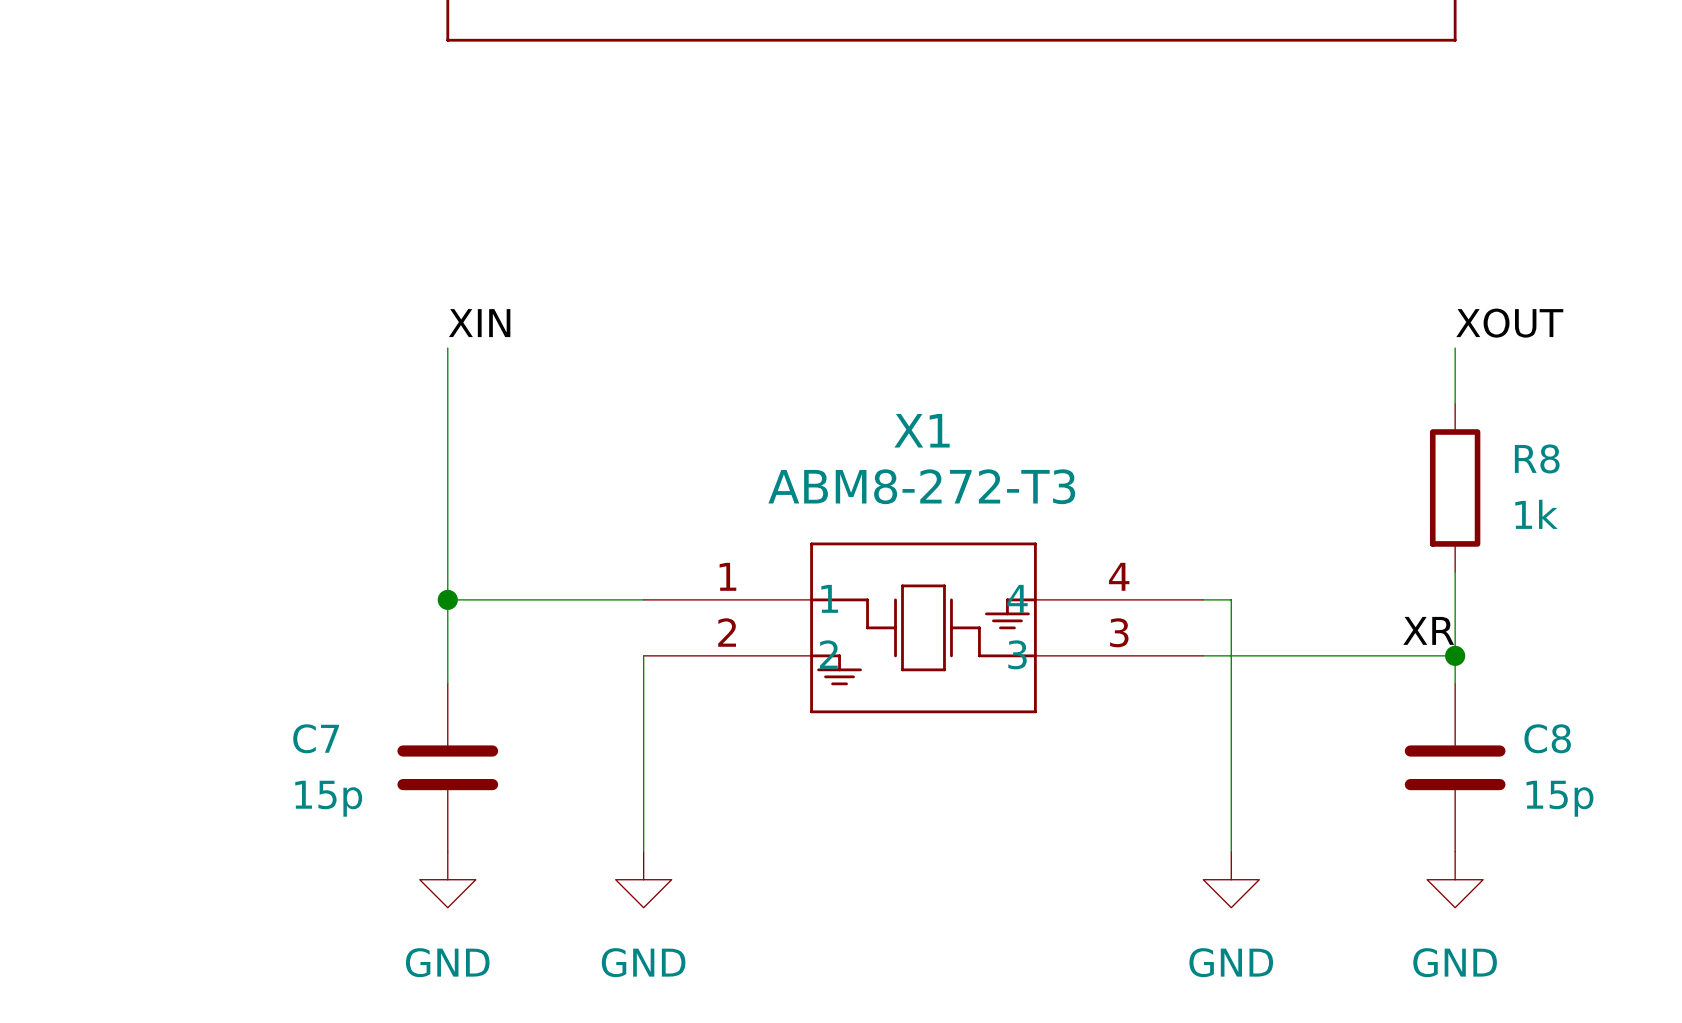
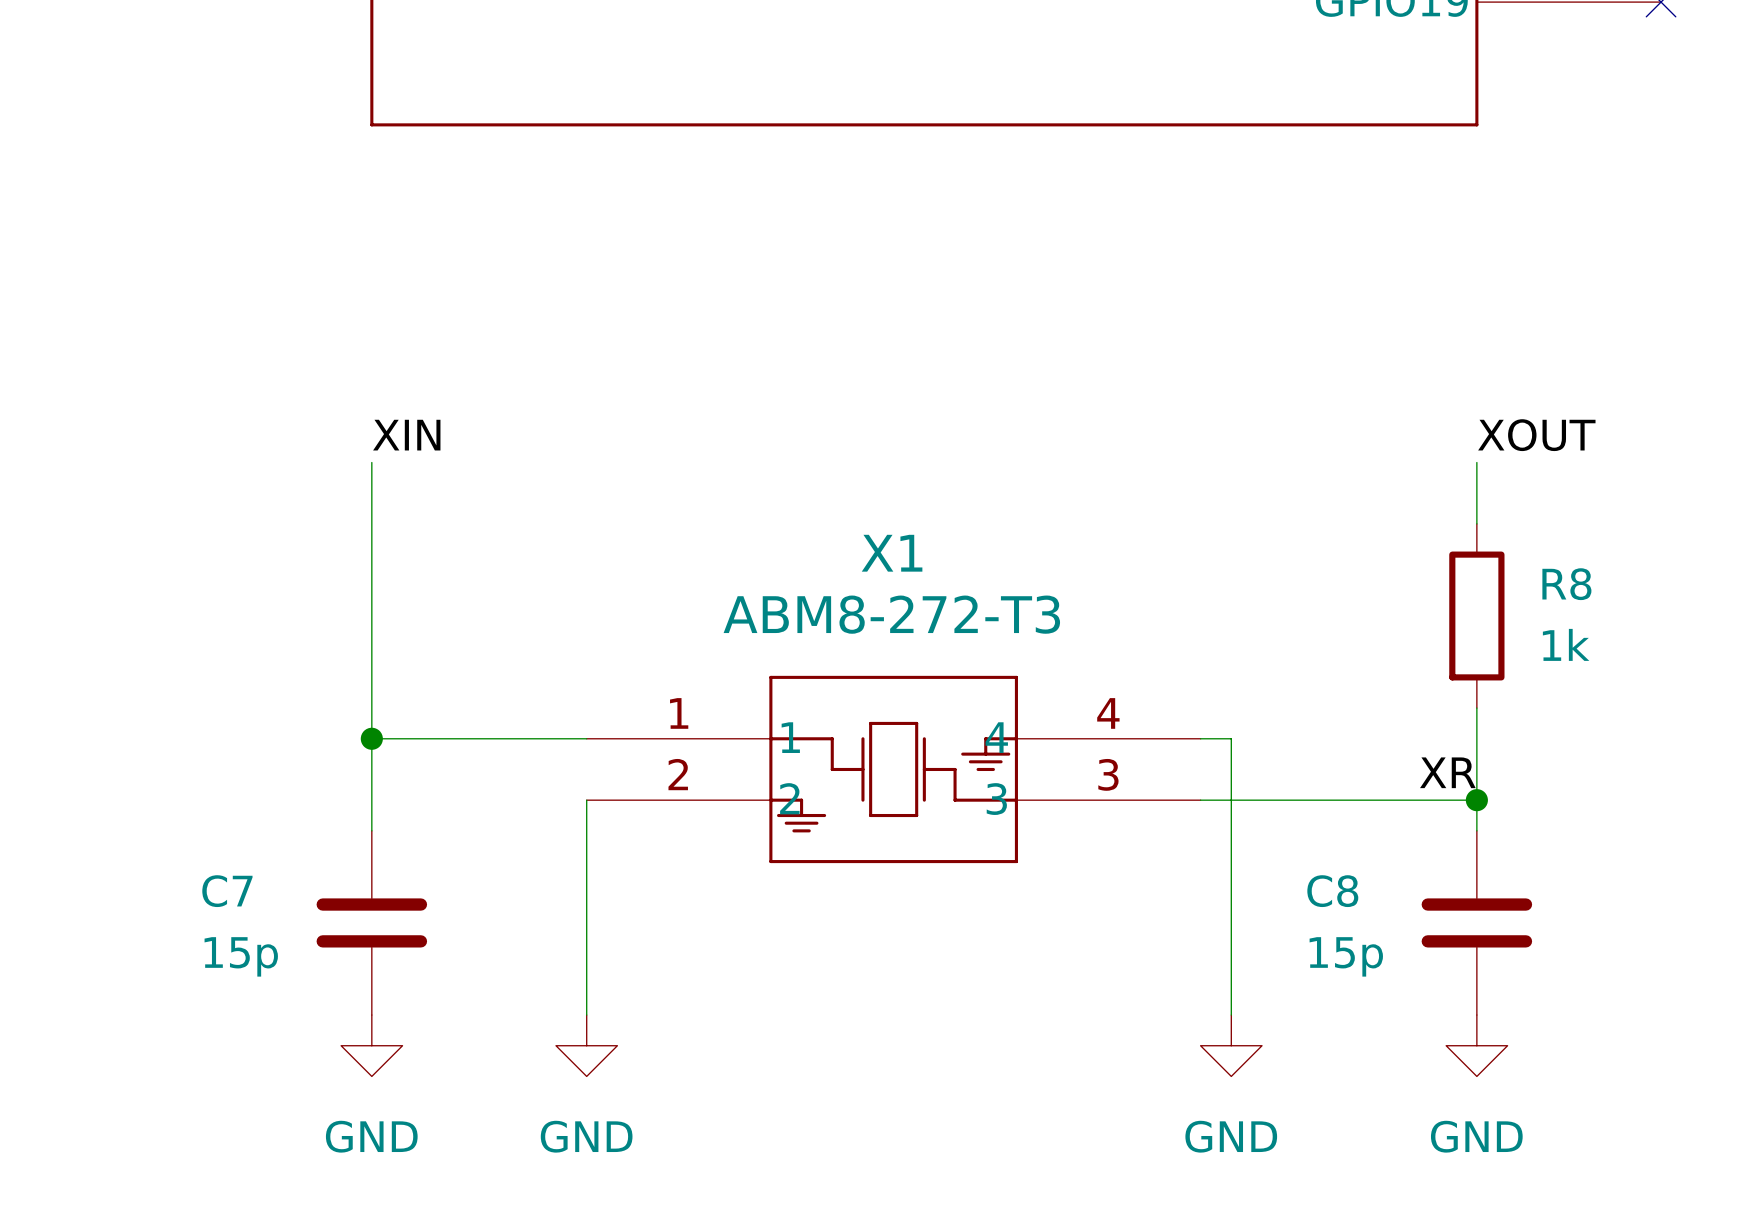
C8 name position: C8 (1547, 738) -> C8 (1332, 891)
C8 value position: 15p (1559, 798) -> 15p (1346, 956)

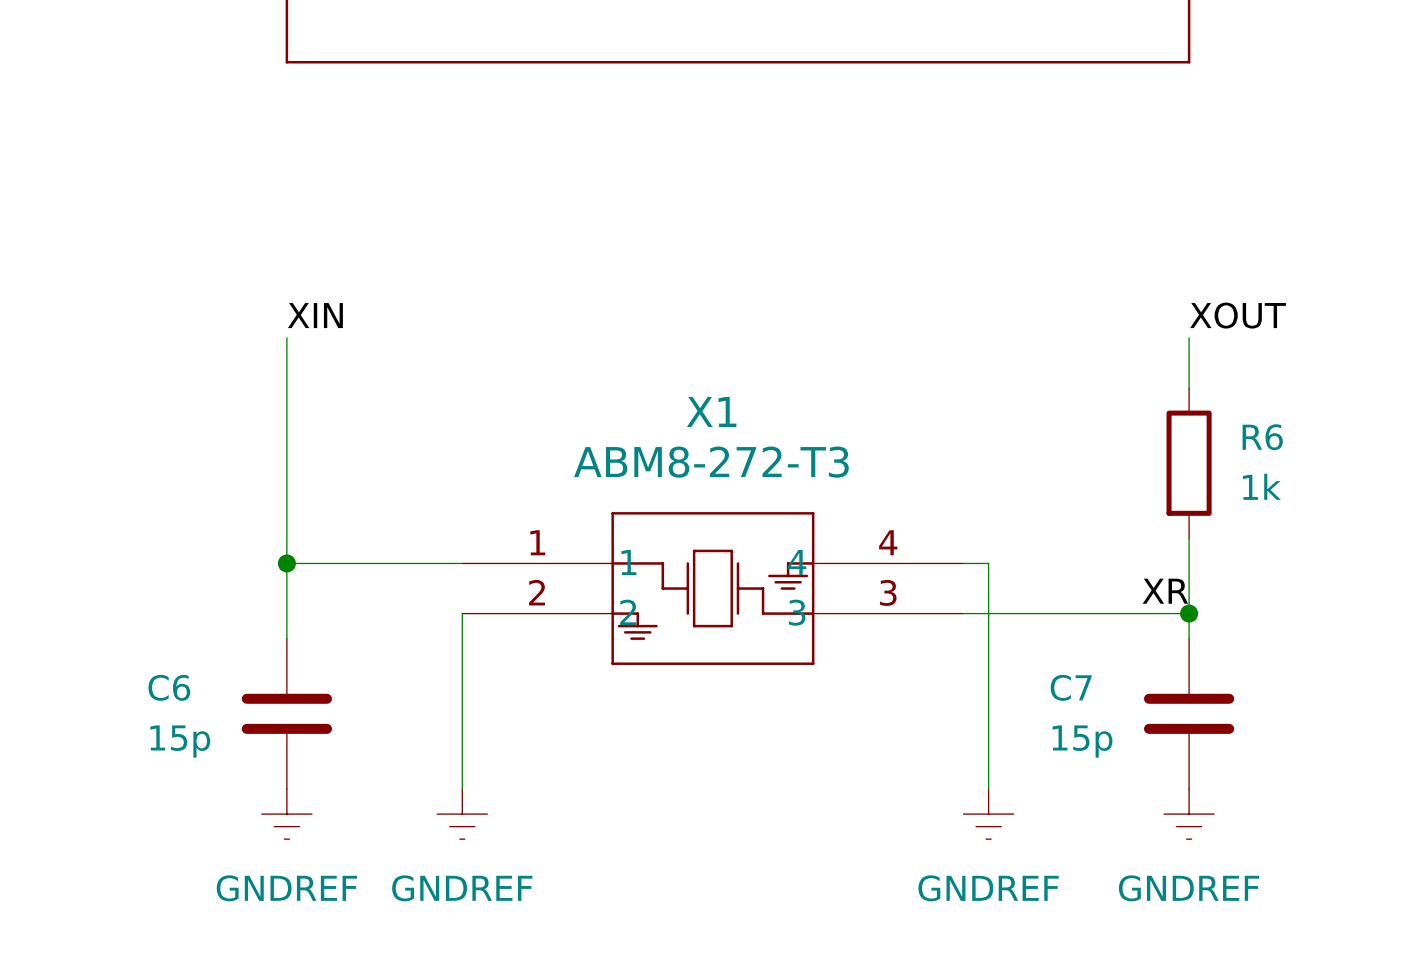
R8 name: R8 (1566, 584) -> R6 (1262, 437)
C7 name: C7 (227, 891) -> C6 (169, 687)
C8 name: C8 (1332, 891) -> C7 (1071, 687)
power symbol: GND (371, 1045) -> GNDREF (286, 814)
power symbol: GND (586, 1045) -> GNDREF (462, 814)
power symbol: GND (1231, 1045) -> GNDREF (988, 814)
power symbol: GND (1476, 1045) -> GNDREF (1189, 814)

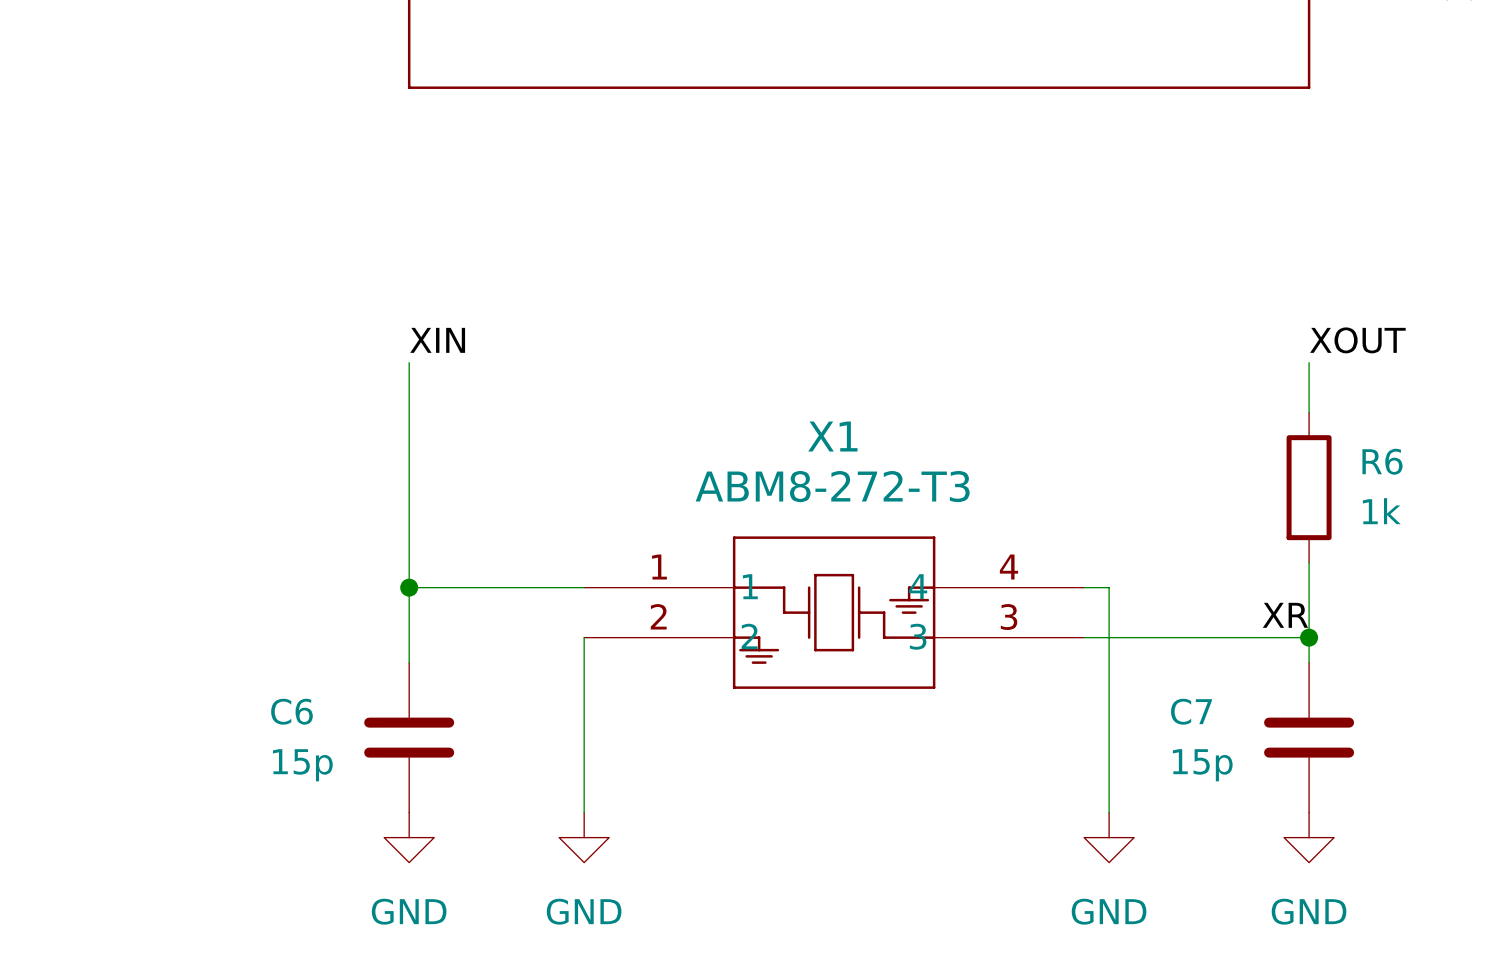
power symbol: GNDREF (286, 814) -> GND (409, 837)
power symbol: GNDREF (462, 814) -> GND (584, 837)
power symbol: GNDREF (988, 814) -> GND (1109, 837)
power symbol: GNDREF (1189, 814) -> GND (1309, 837)

